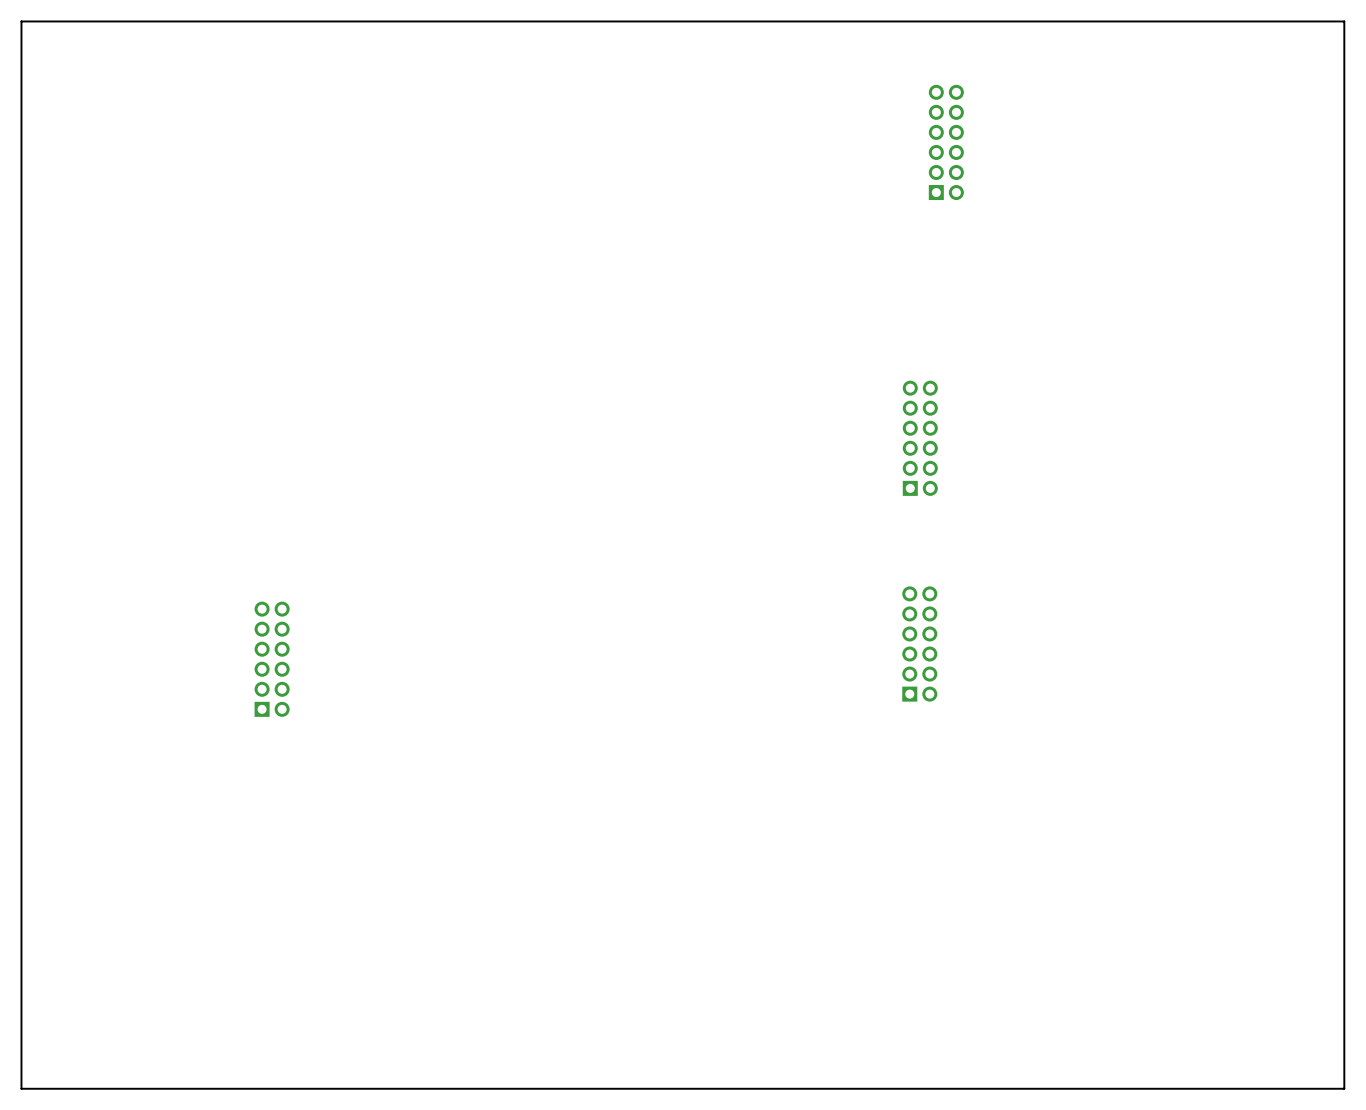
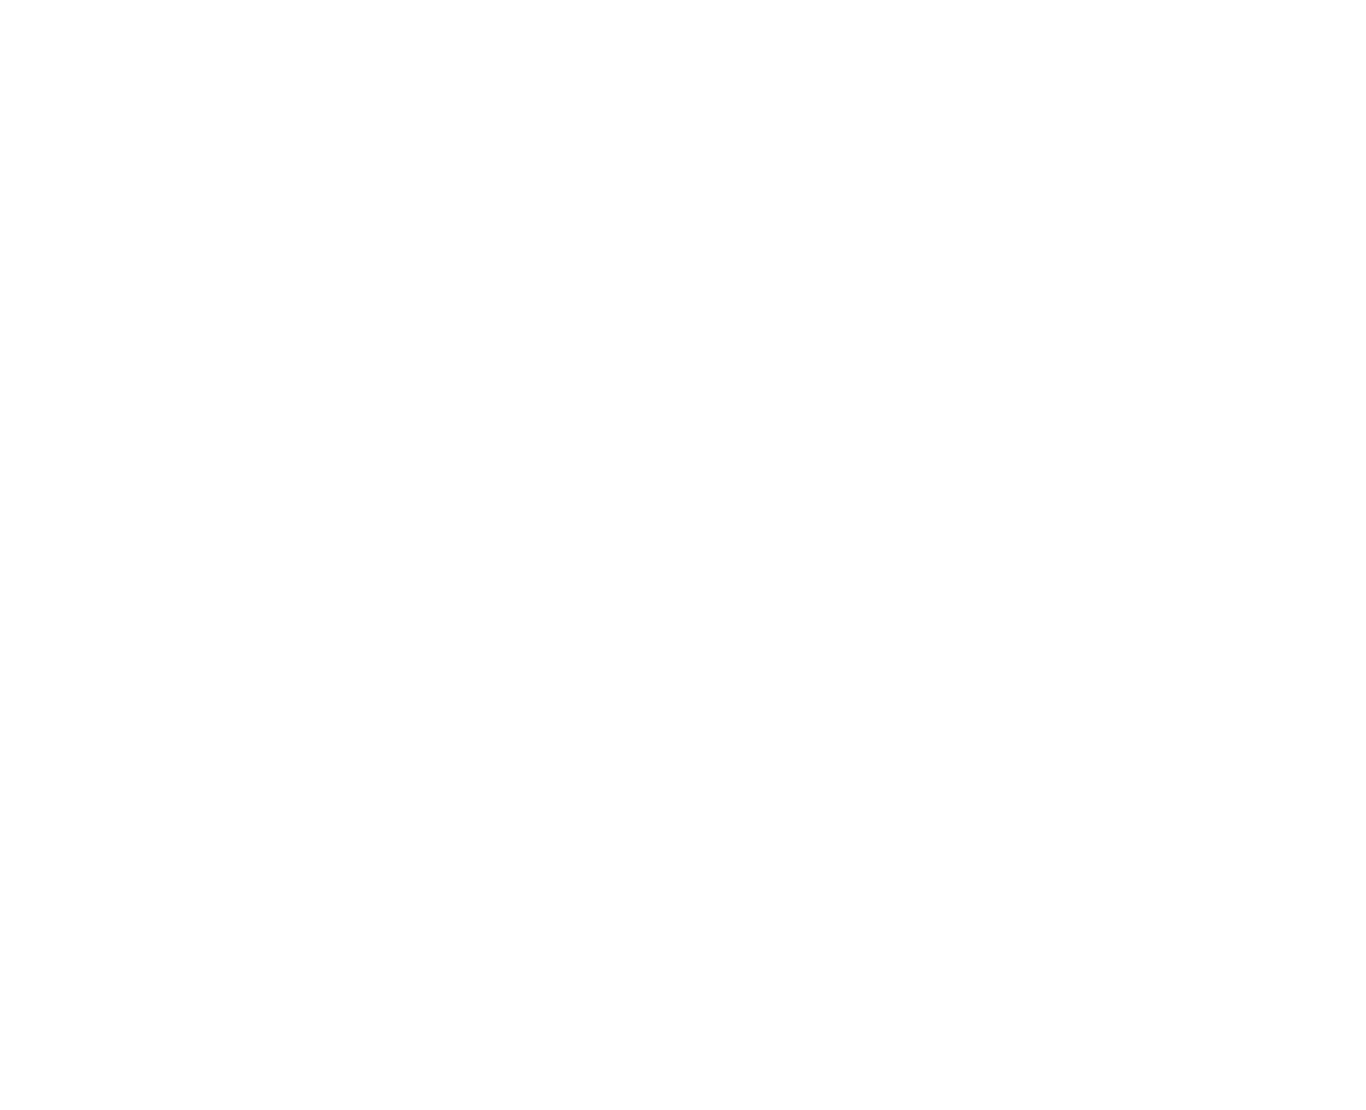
board edge: (1344, 21) (21, 21) (21, 1088) (1344, 1088) (1344, 21) -> none
part: (946, 142) -> none
part: (920, 438) -> none
part: (919, 644) -> none
part: (272, 659) -> none

